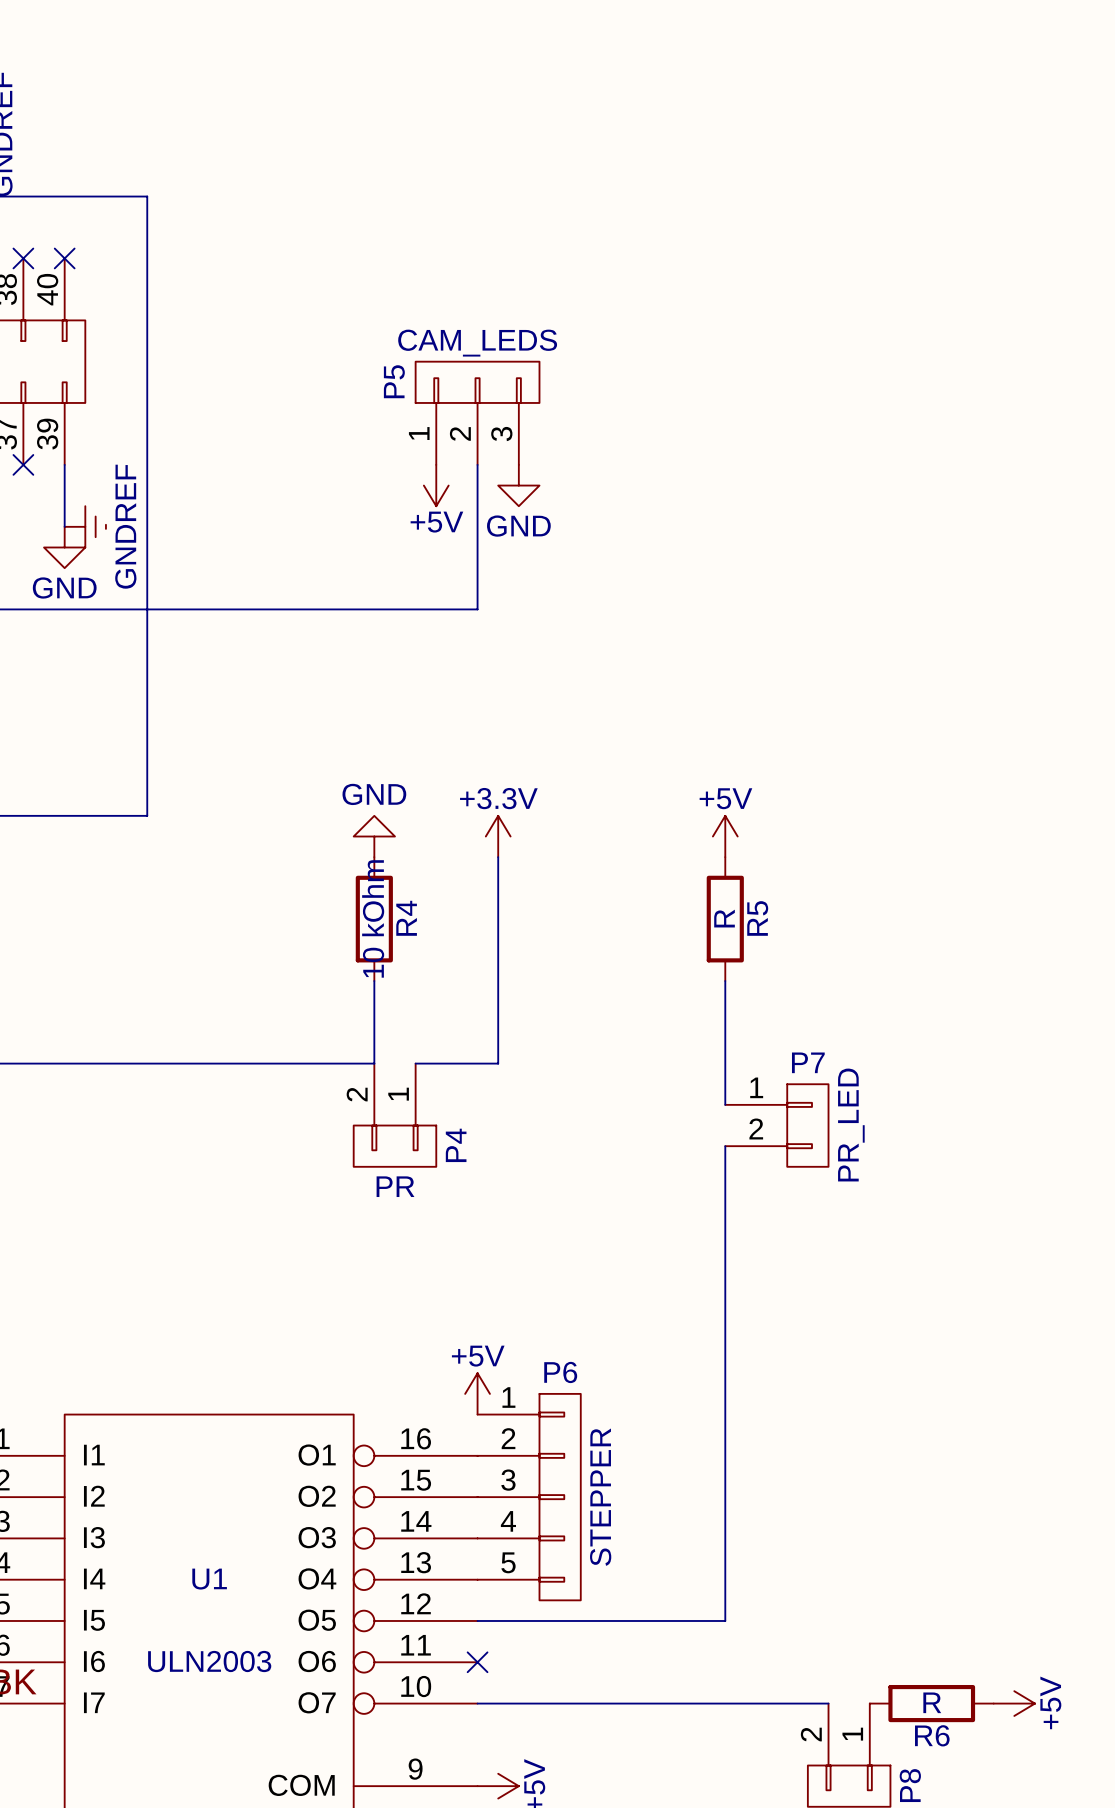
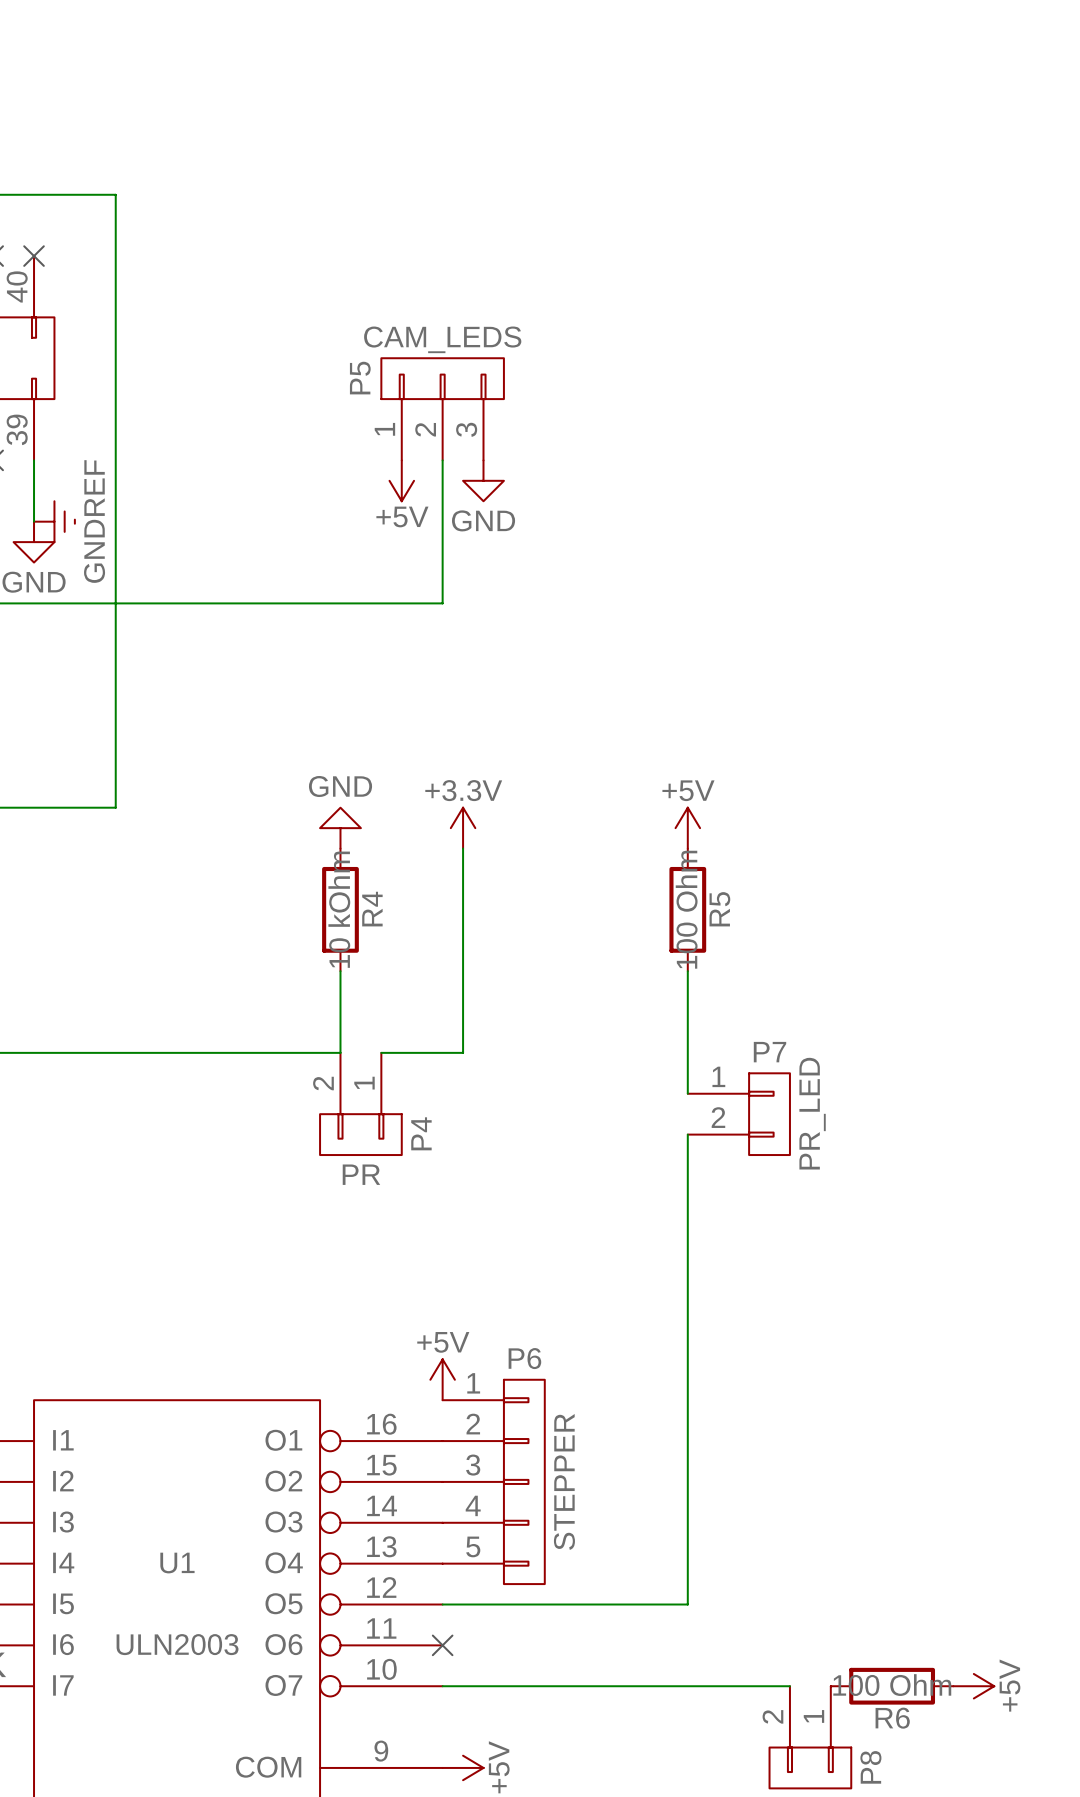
R5 value: R (724, 918) -> 100 Ohm (686, 909)
R6 value: R (932, 1702) -> 100 Ohm (892, 1685)

